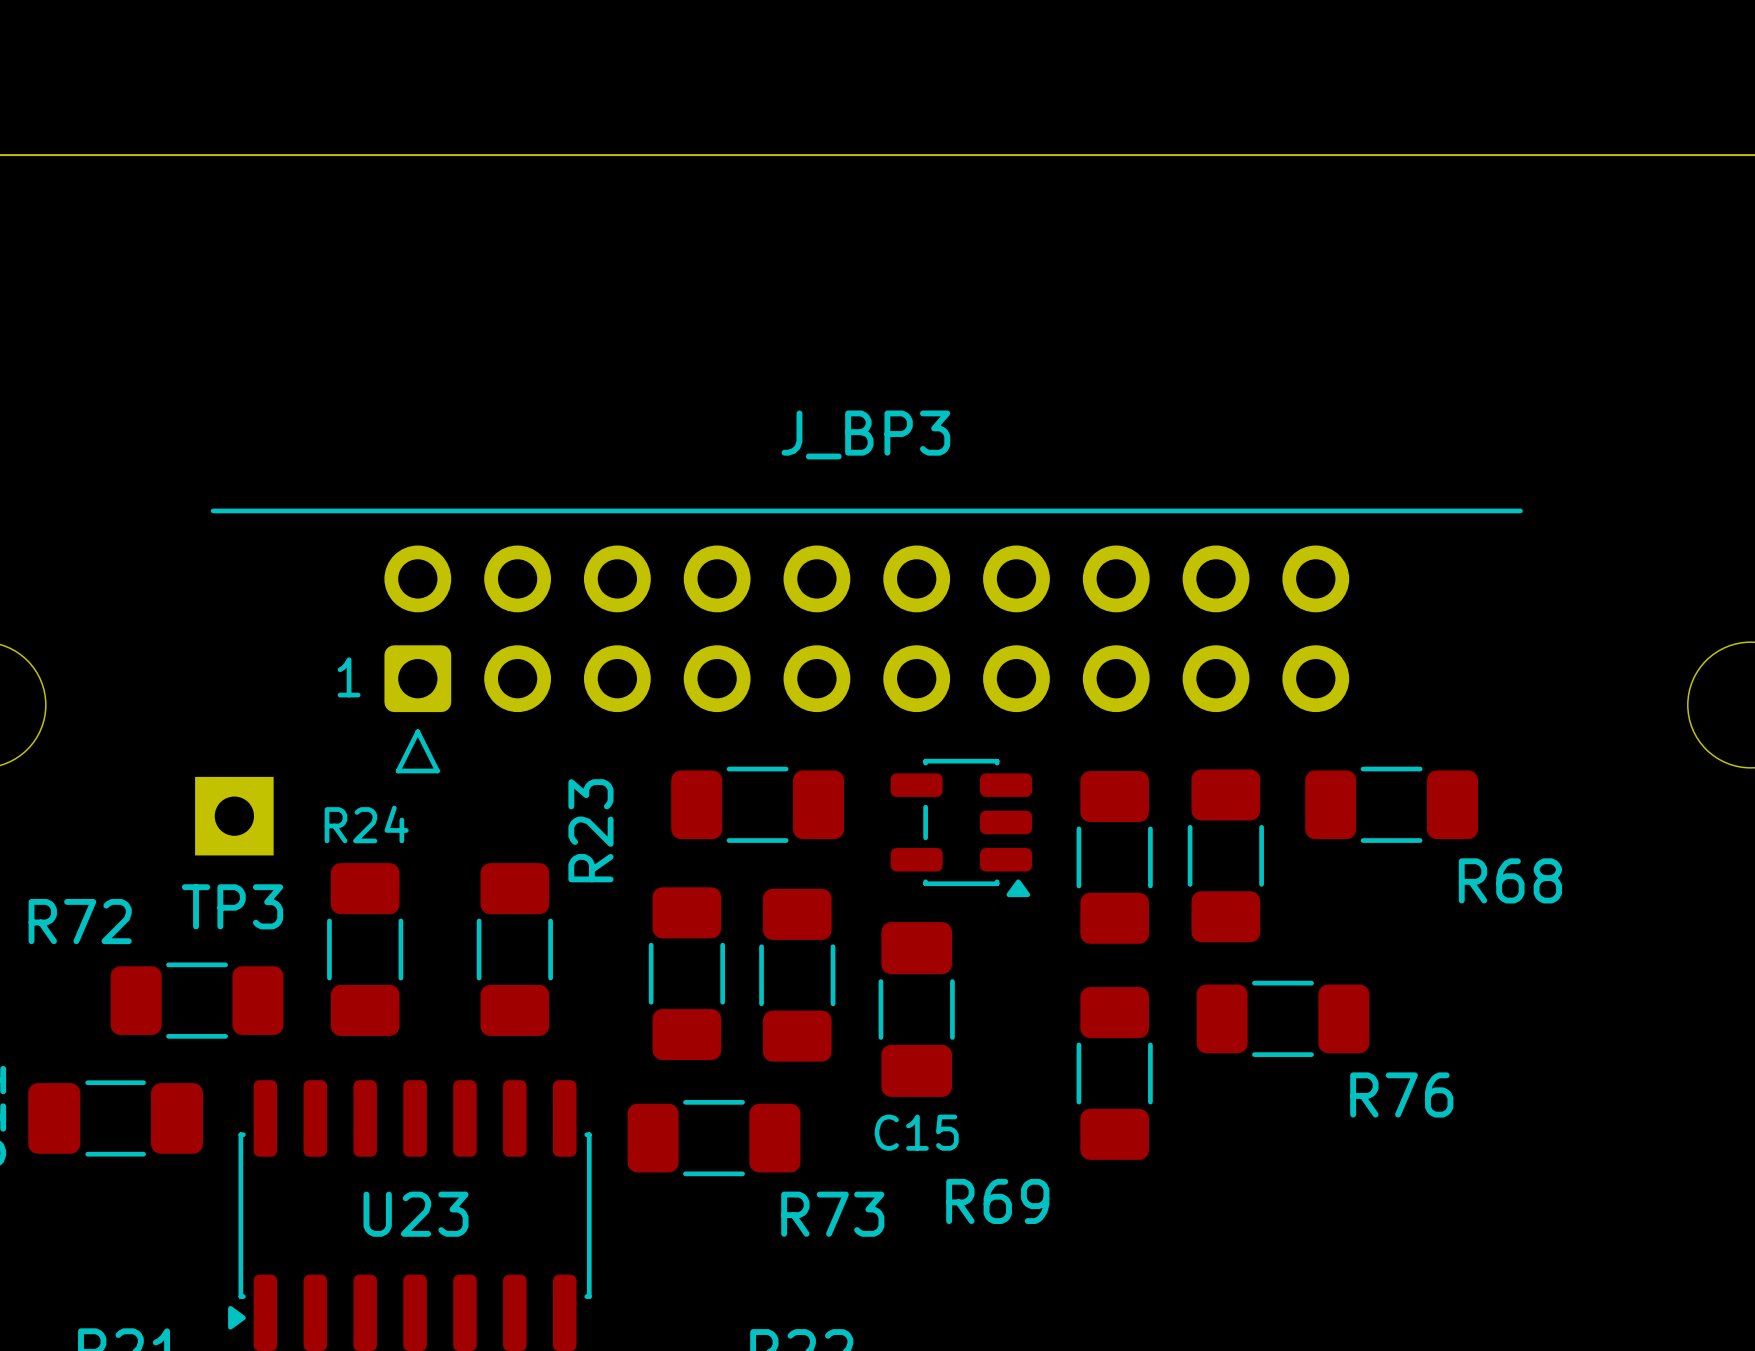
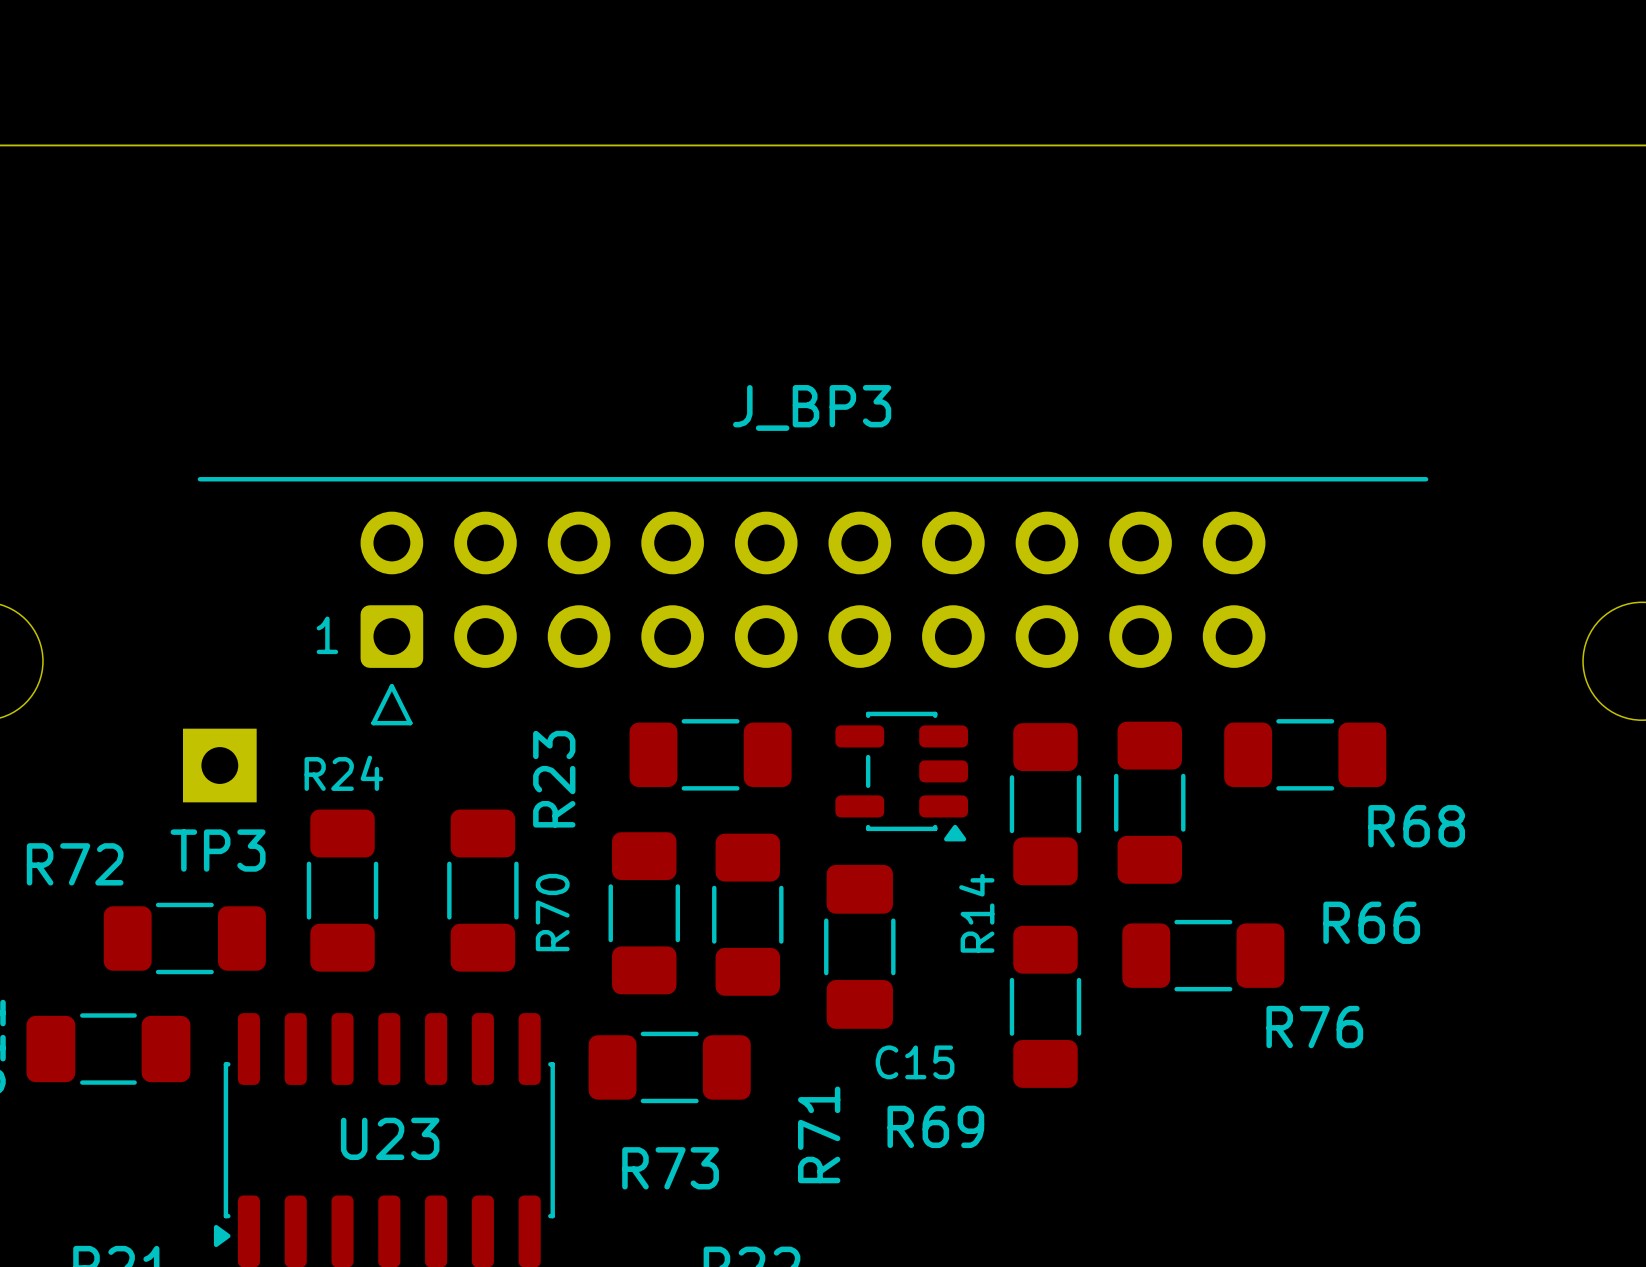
R70 name: none -> R70 (552, 912)
R14 name: none -> R14 (976, 913)
R66 name: none -> R66 (1371, 922)
C15 name position: C15 (916, 1132) -> C15 (915, 1062)
R71 name: none -> R71 (819, 1134)
R73 name position: R73 (832, 1214) -> R73 (670, 1168)

